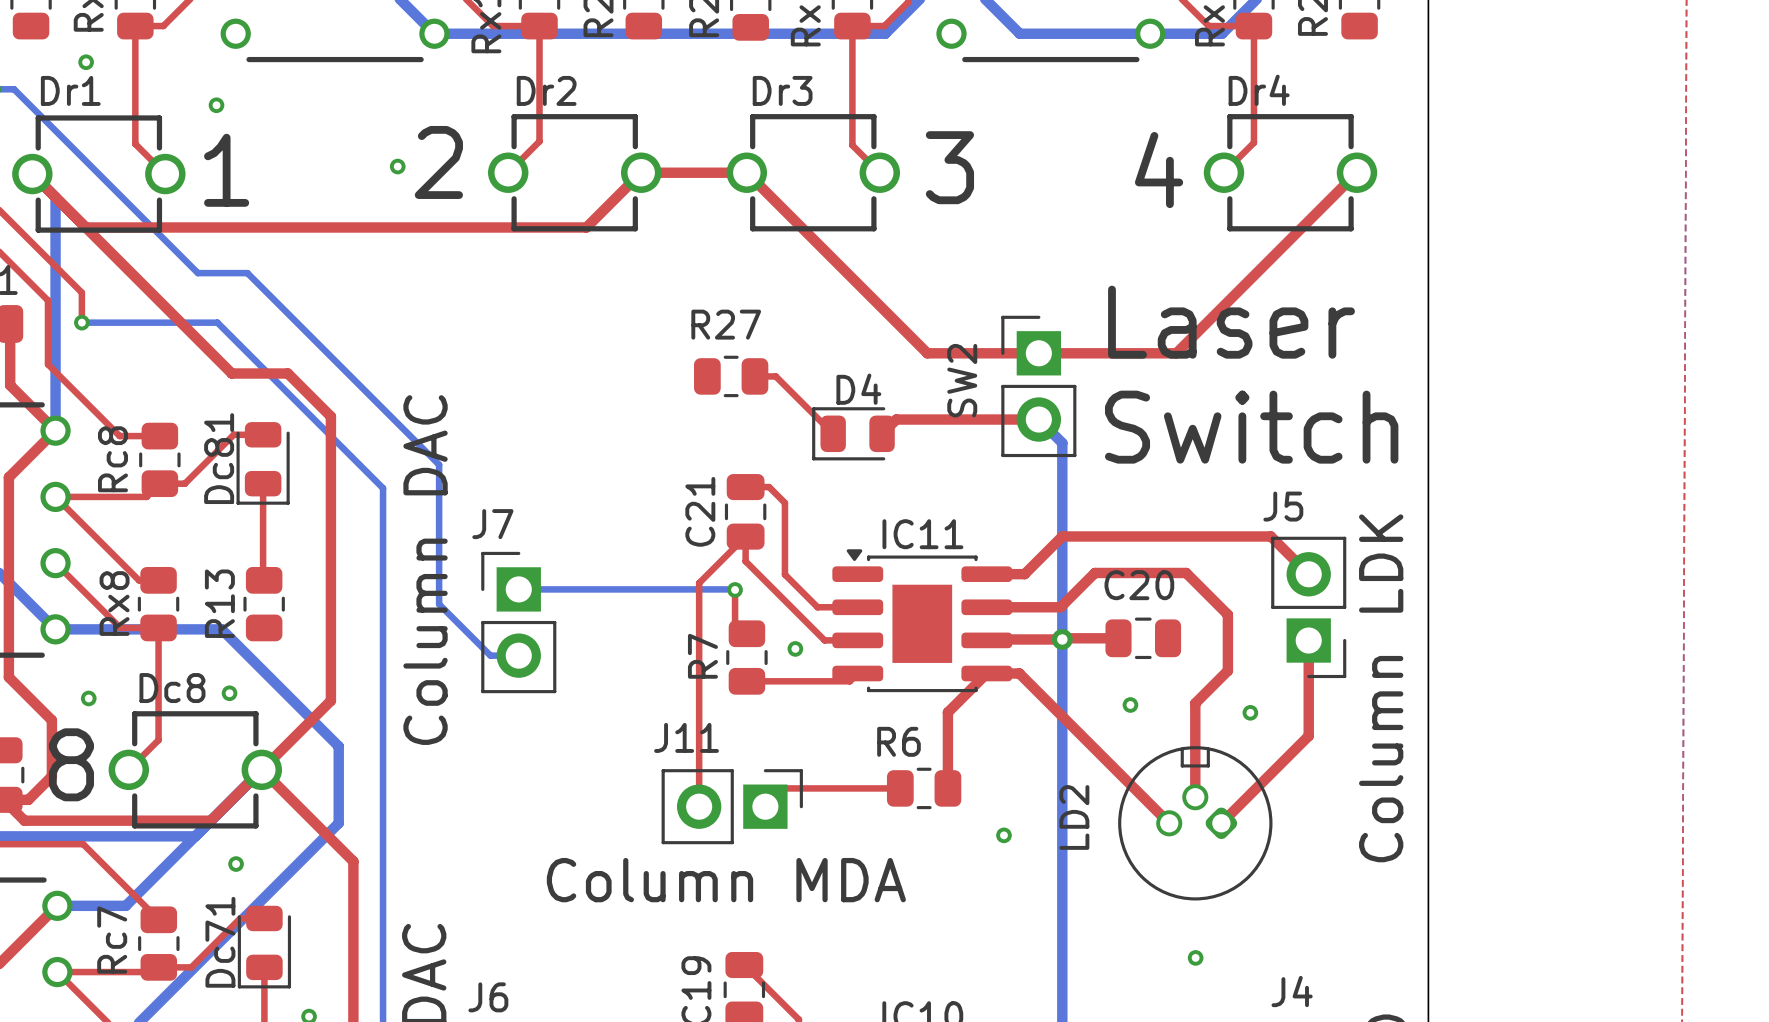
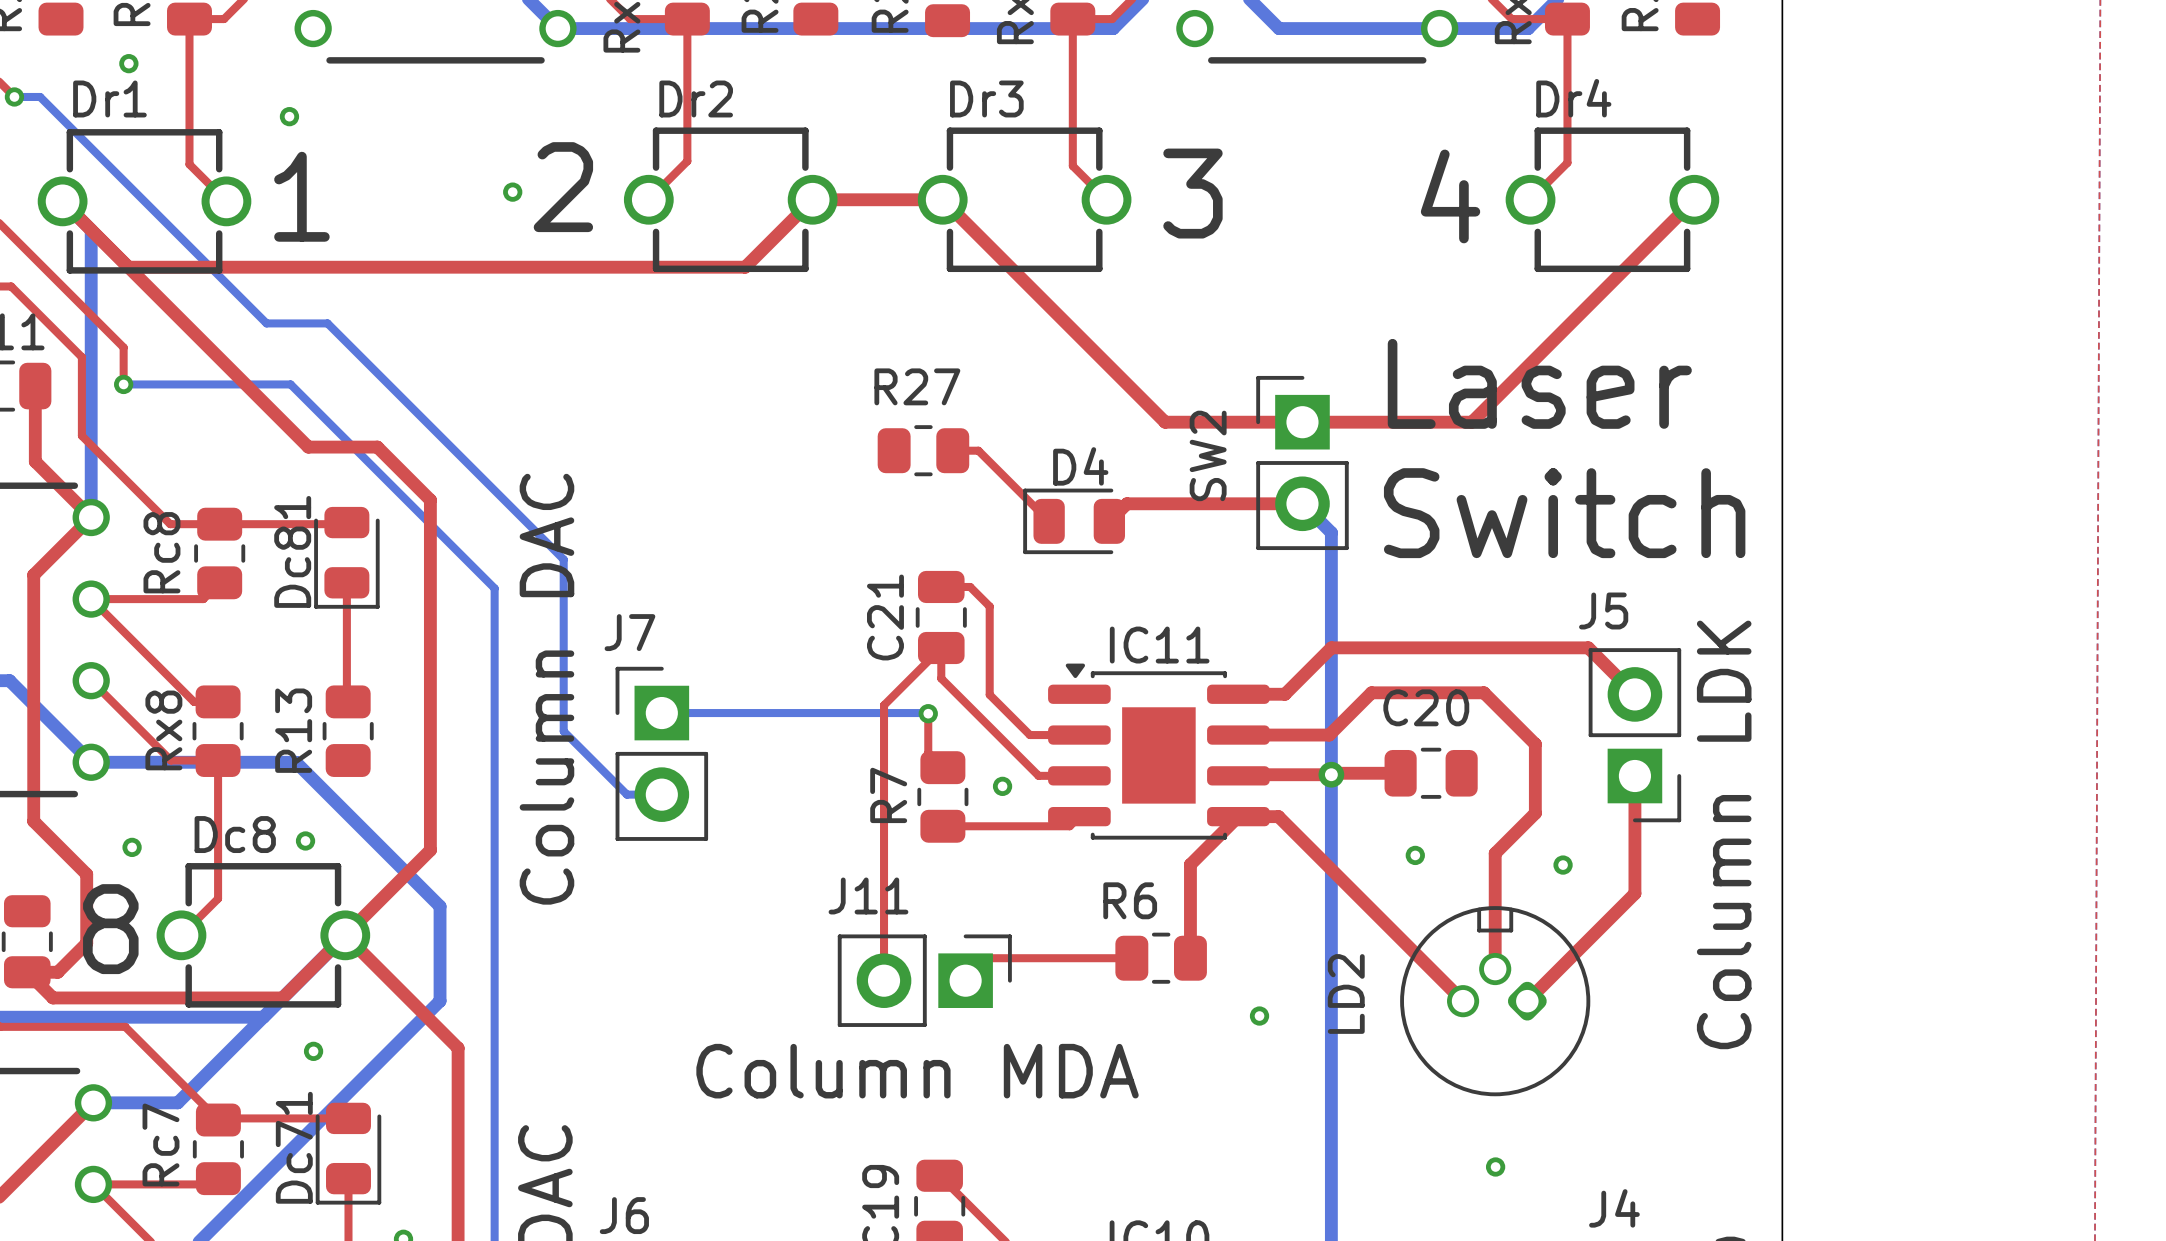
top track: (263, 434) (233, 434) (184, 483) (159, 483) -> none
top track: none -> (219, 524) (345, 524)
top track: (240, 918) (191, 967) (158, 967) -> (318, 1118) (220, 1118)

